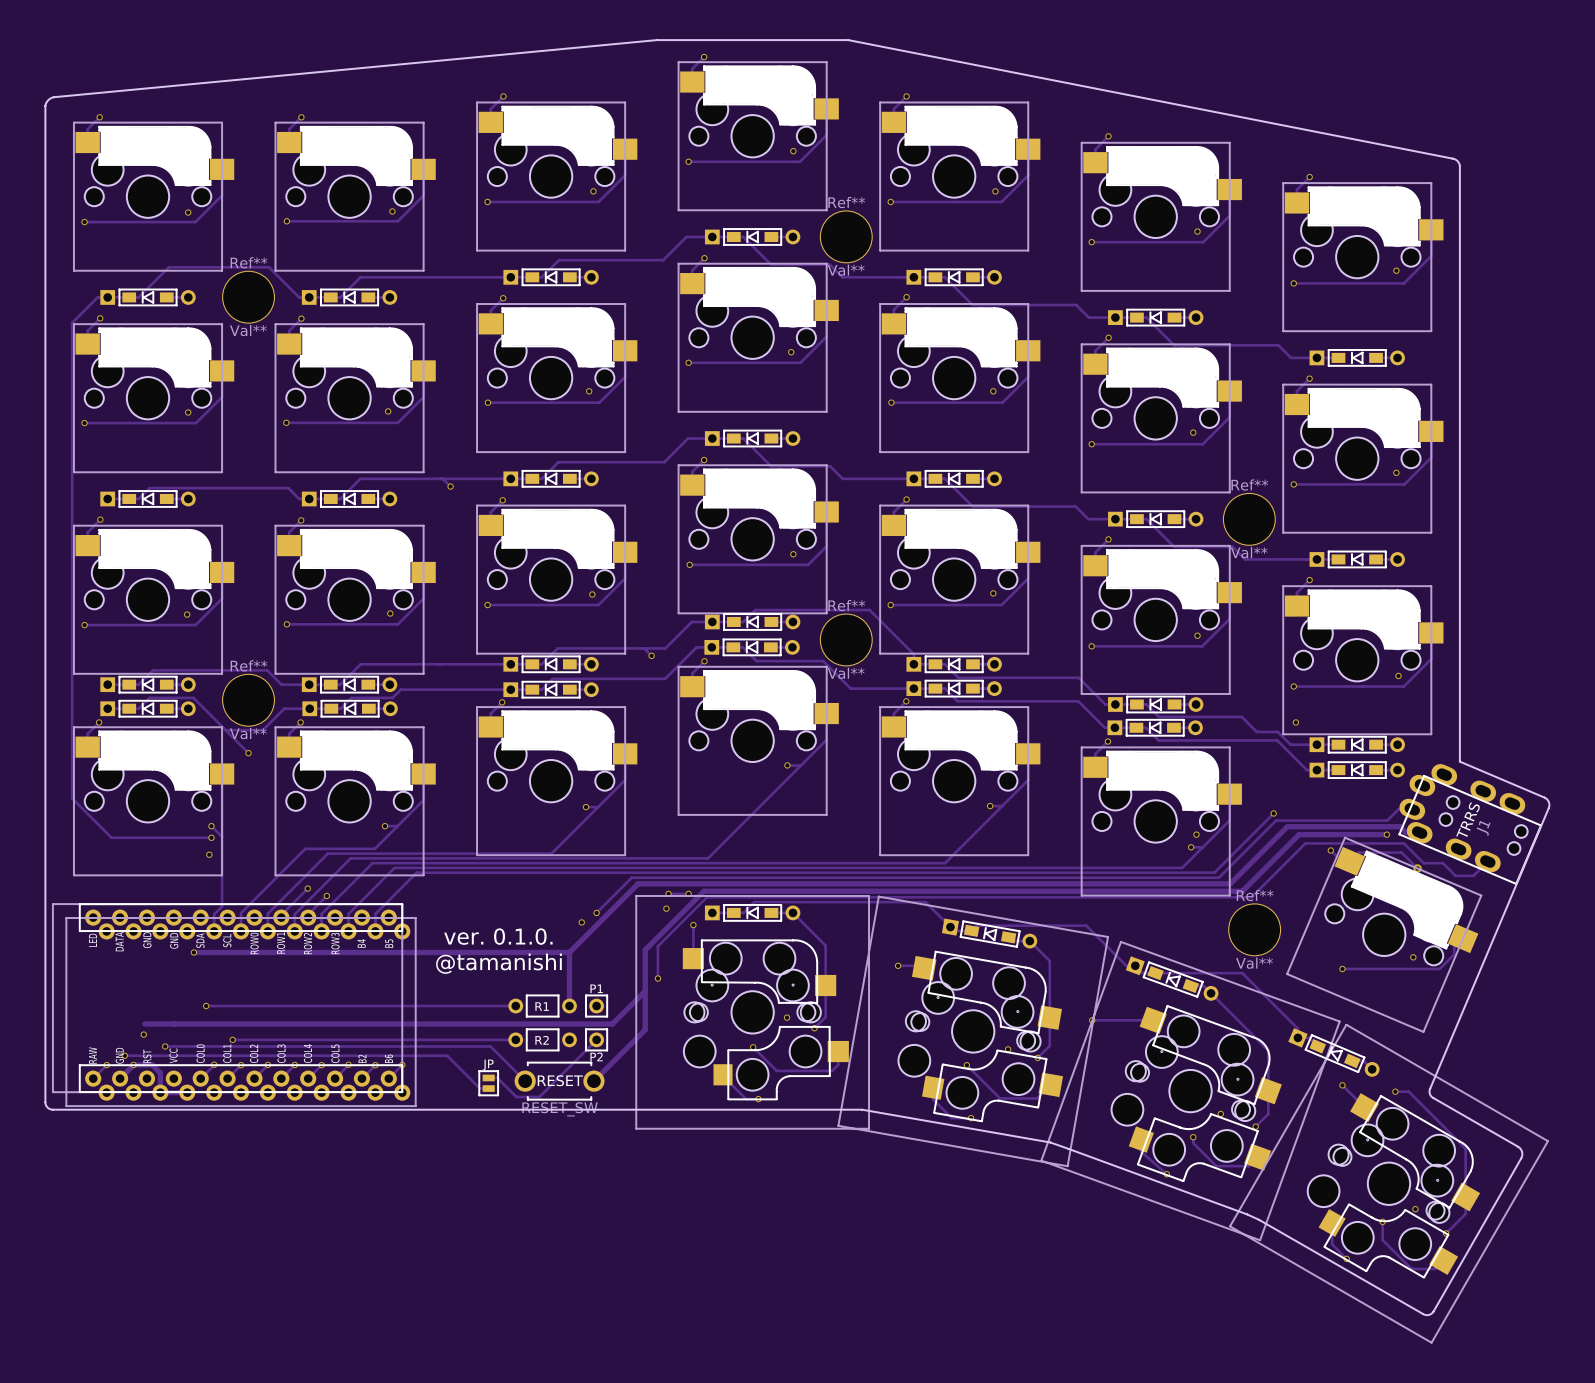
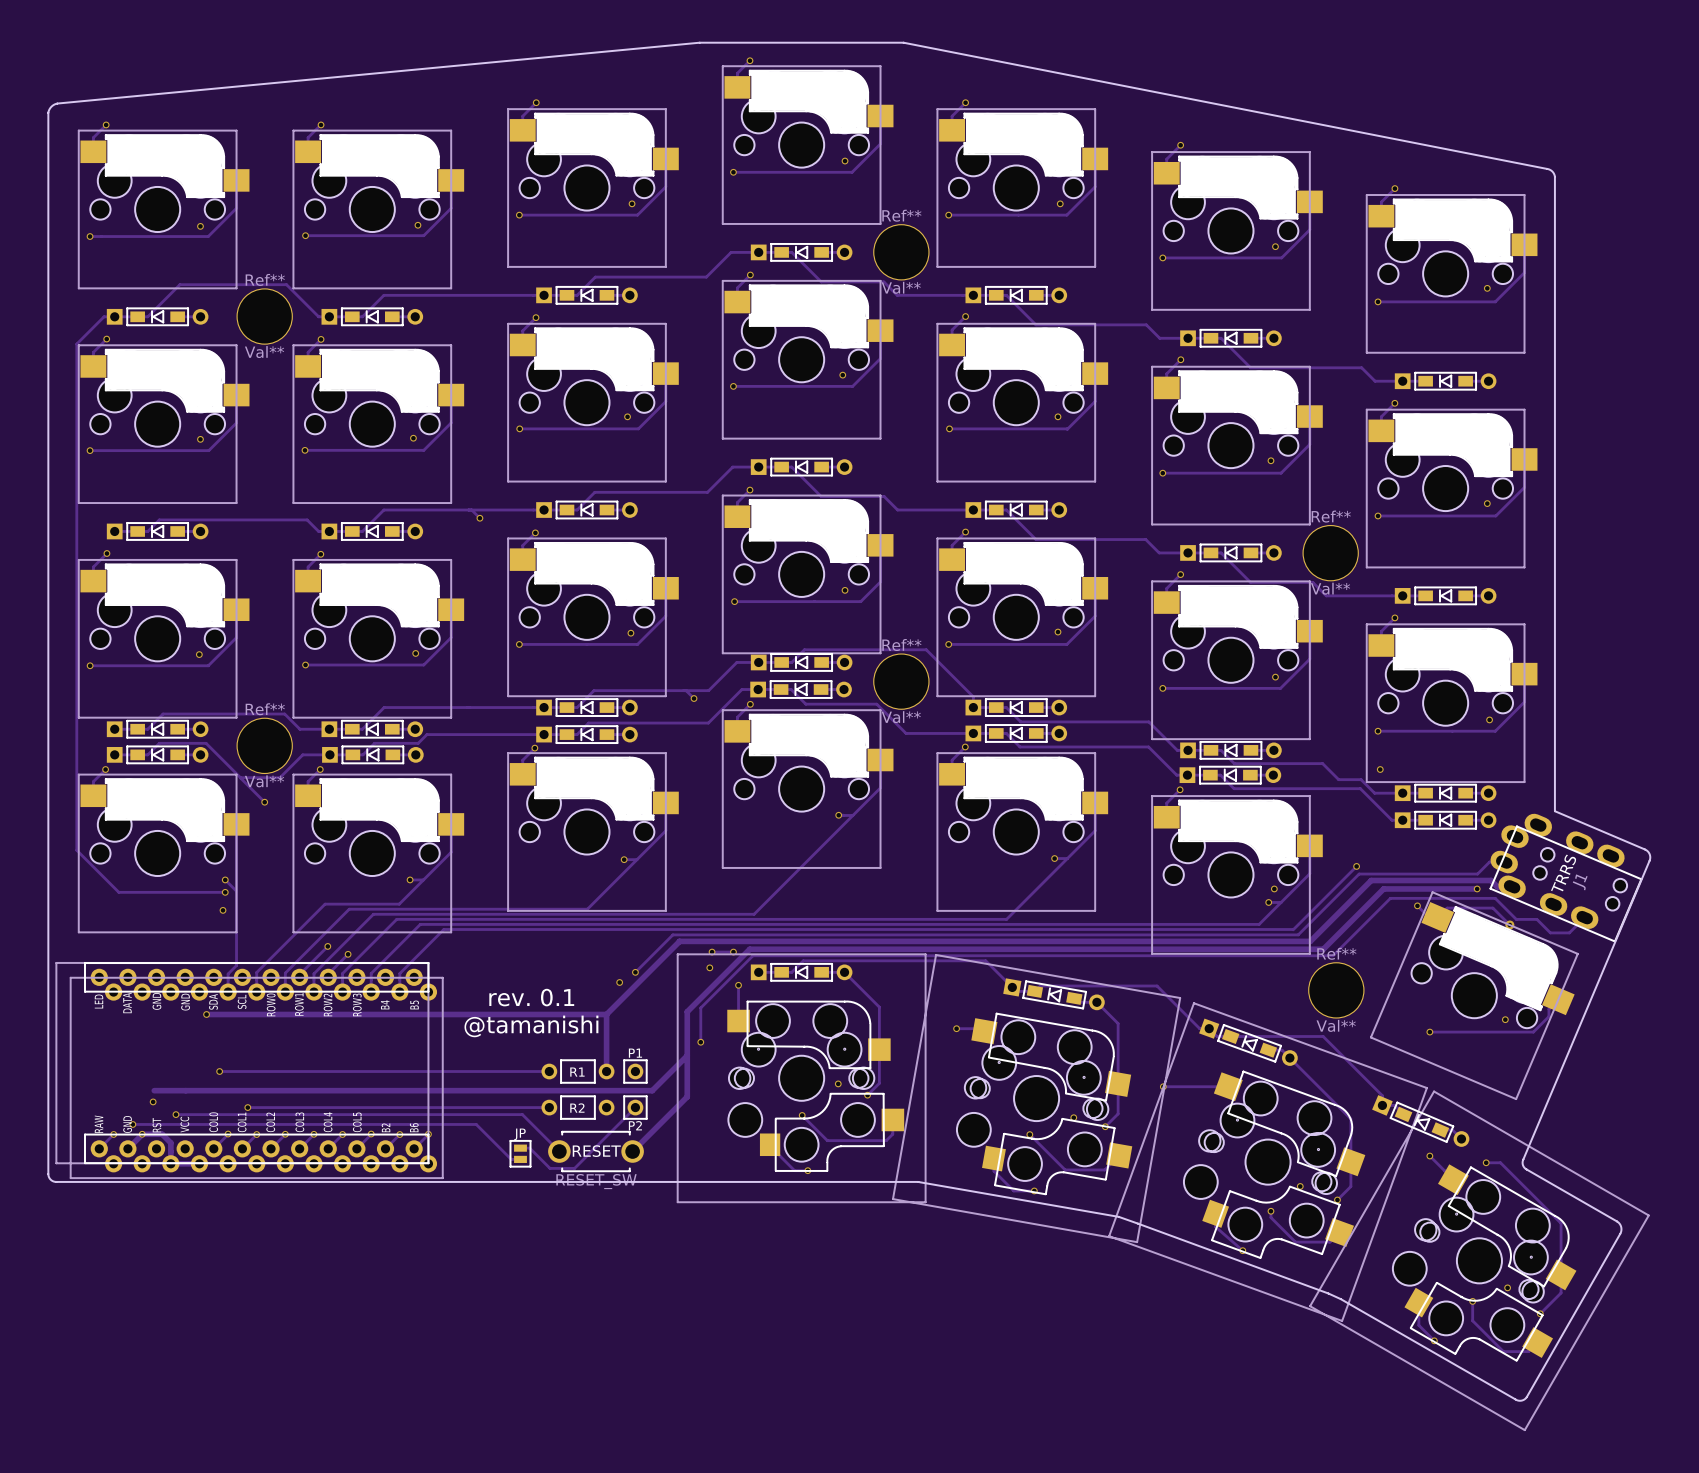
text: ver. 0.1.0. (498, 936) -> rev. 0.1 (531, 997)

